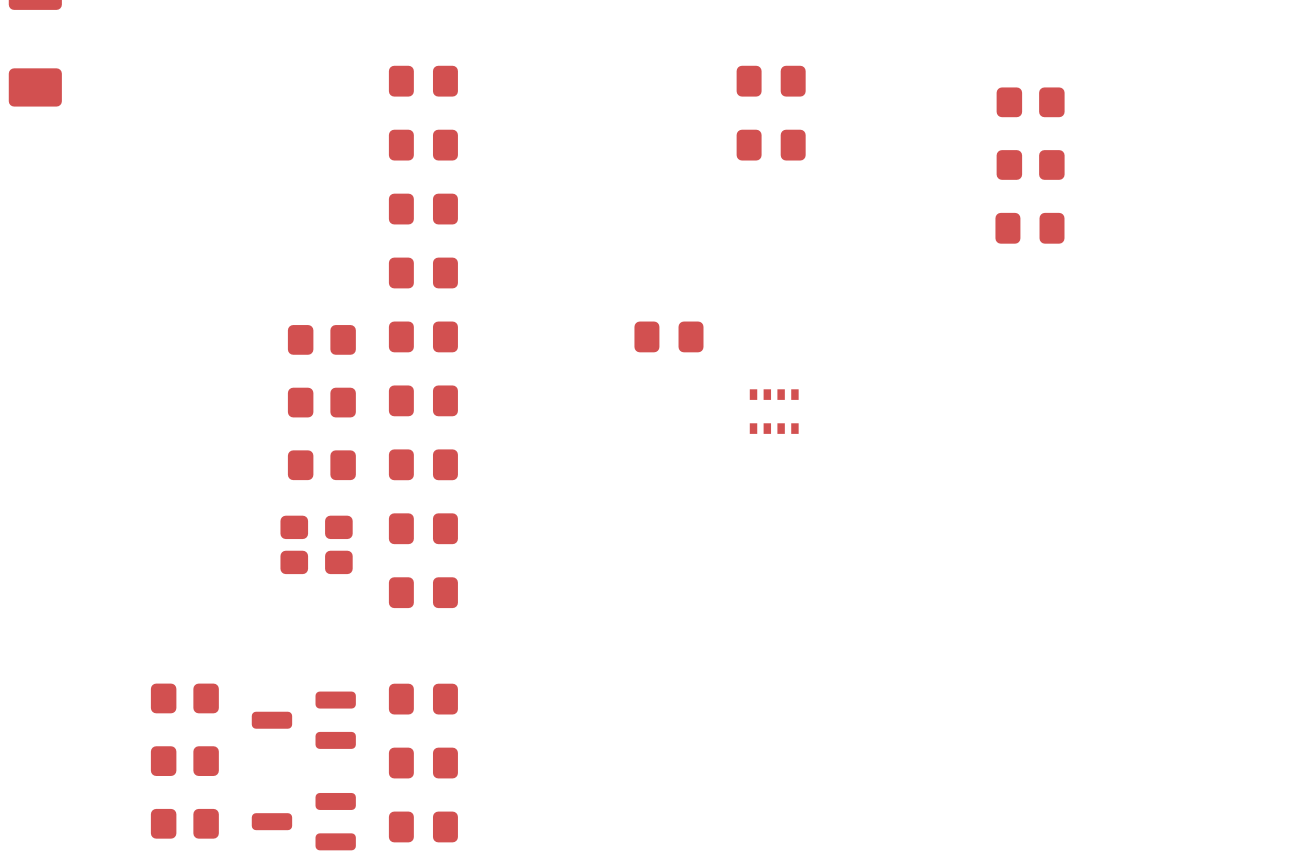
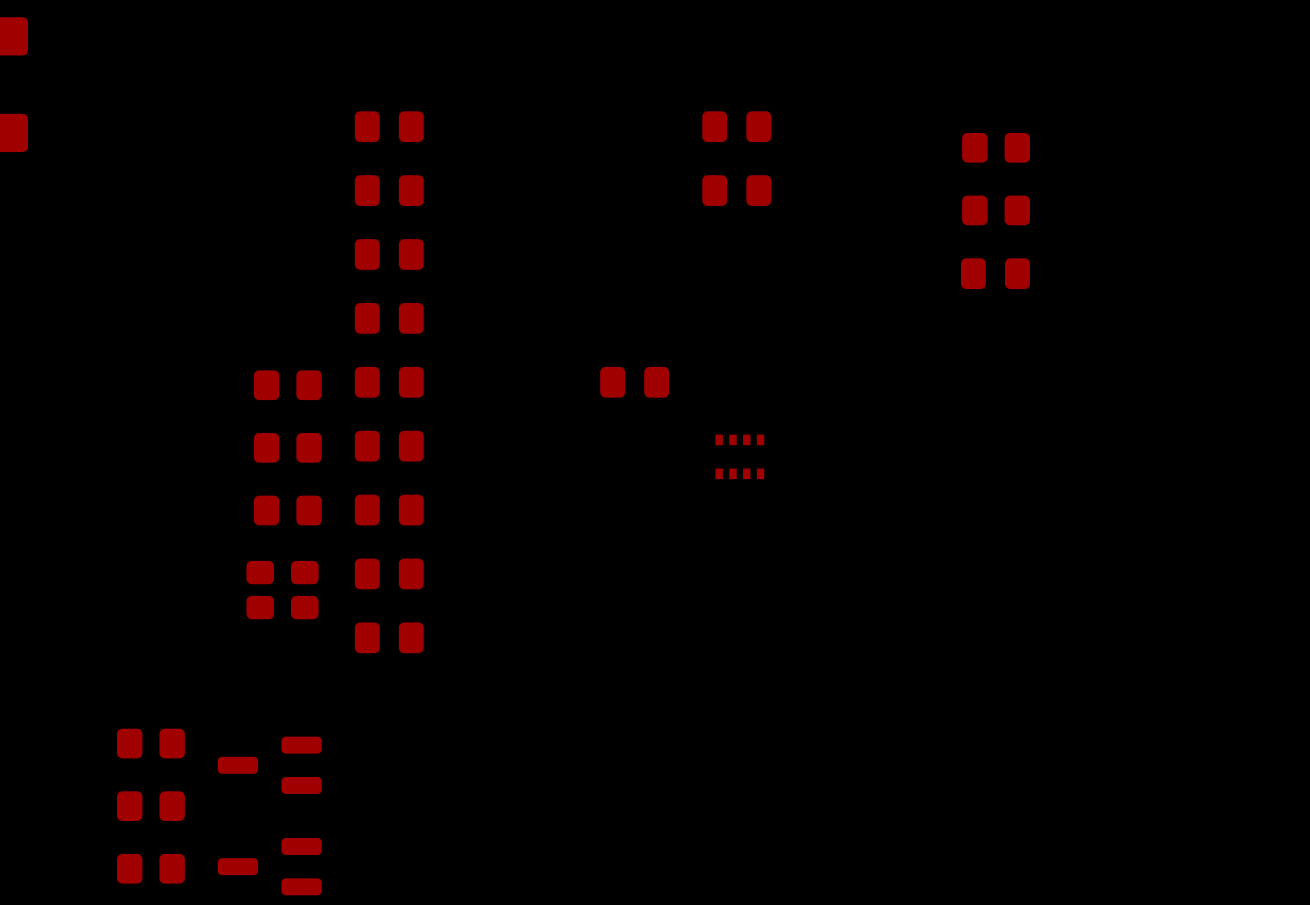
part: (423, 699) -> none
part: (423, 763) -> none
part: (423, 826) -> none

